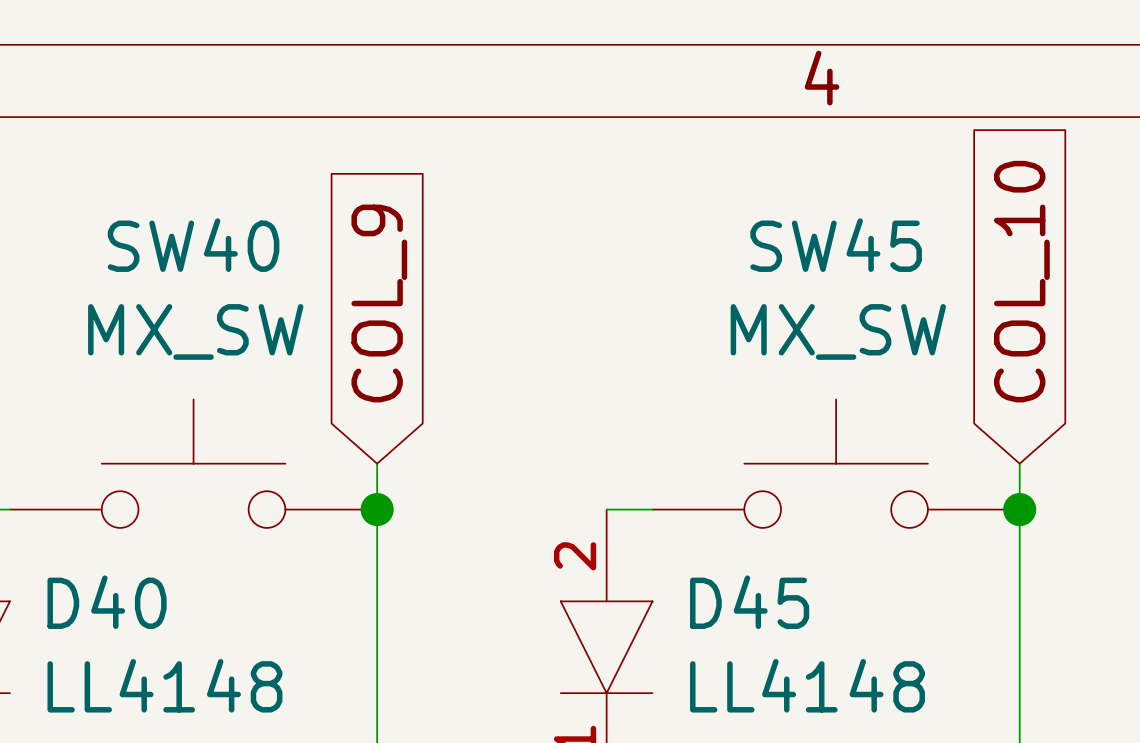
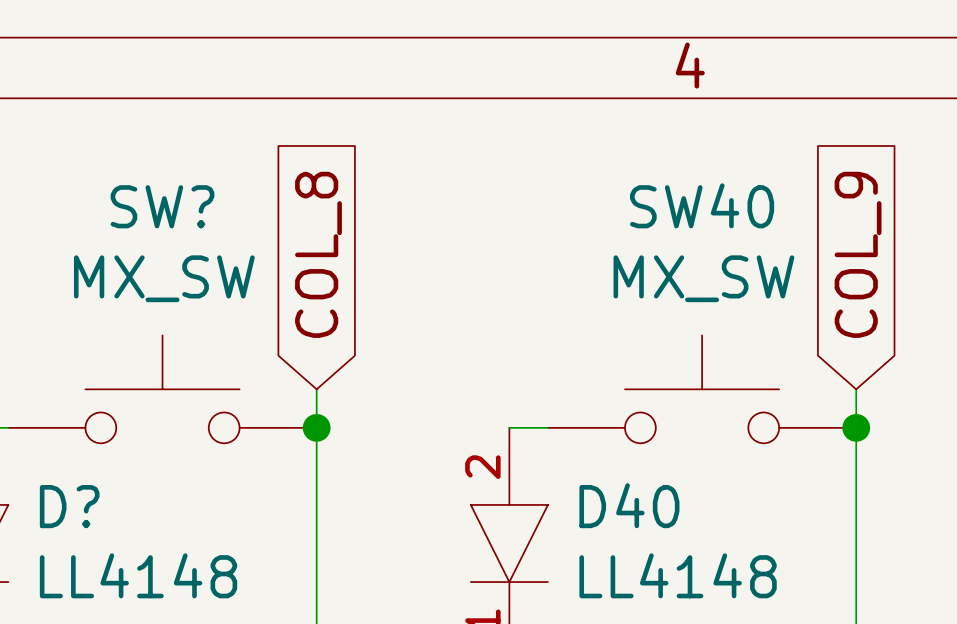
SW40 name: SW40 (193, 245) -> SW? (162, 206)
SW45 name: SW45 (836, 245) -> SW40 (702, 205)
global label: COL_10 (1021, 281) -> COL_9 (858, 254)
global label: COL_9 (379, 303) -> COL_8 (318, 254)
D40 name: D40 (107, 602) -> D? (69, 506)
D45 name: D45 (749, 602) -> D40 (629, 505)

